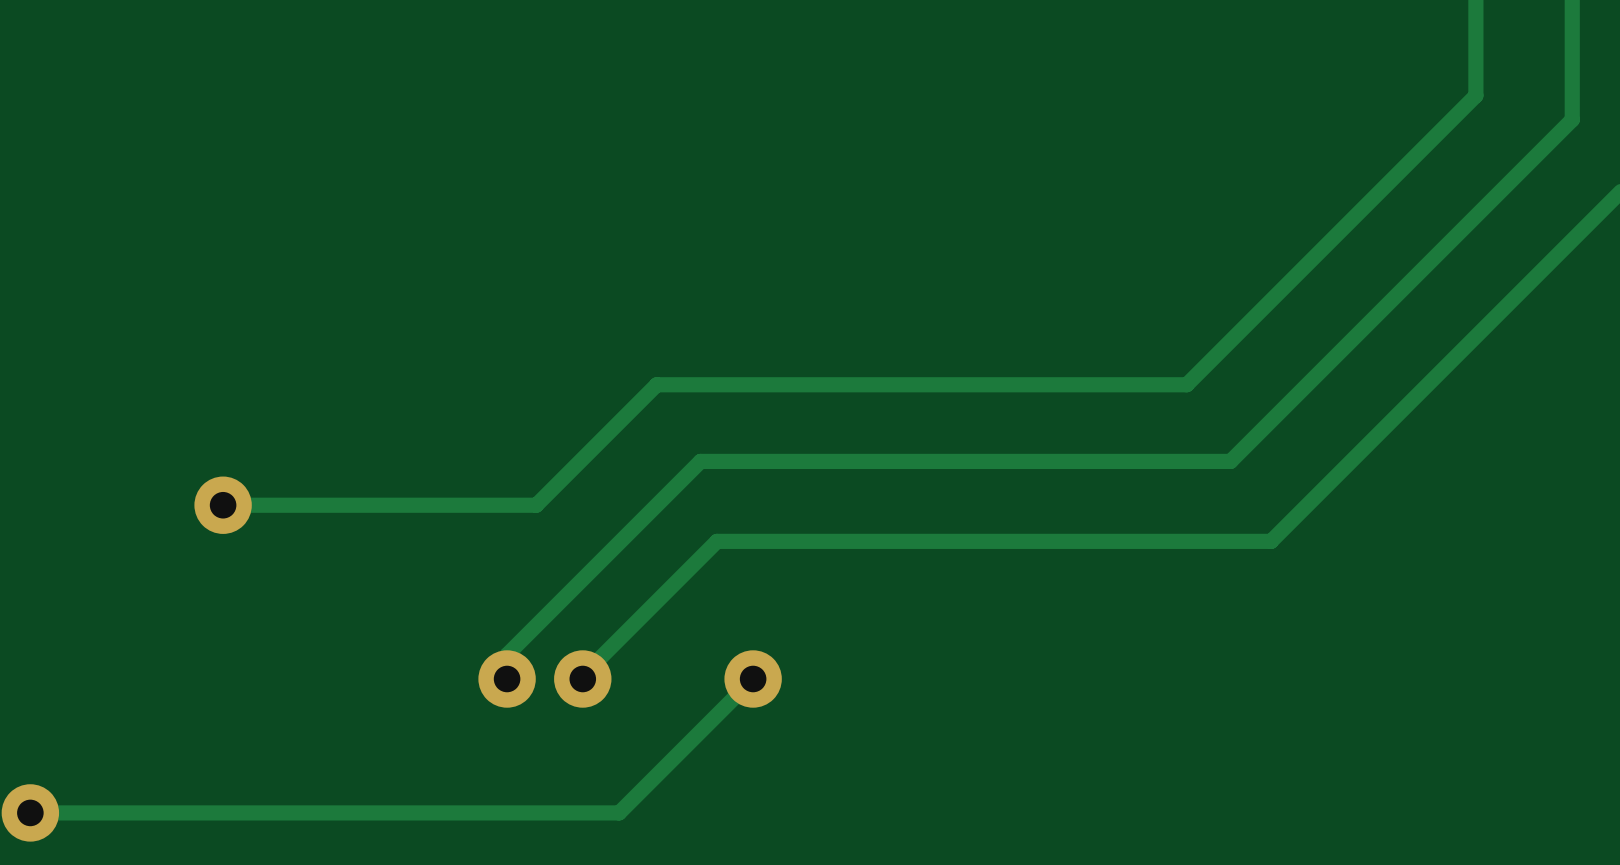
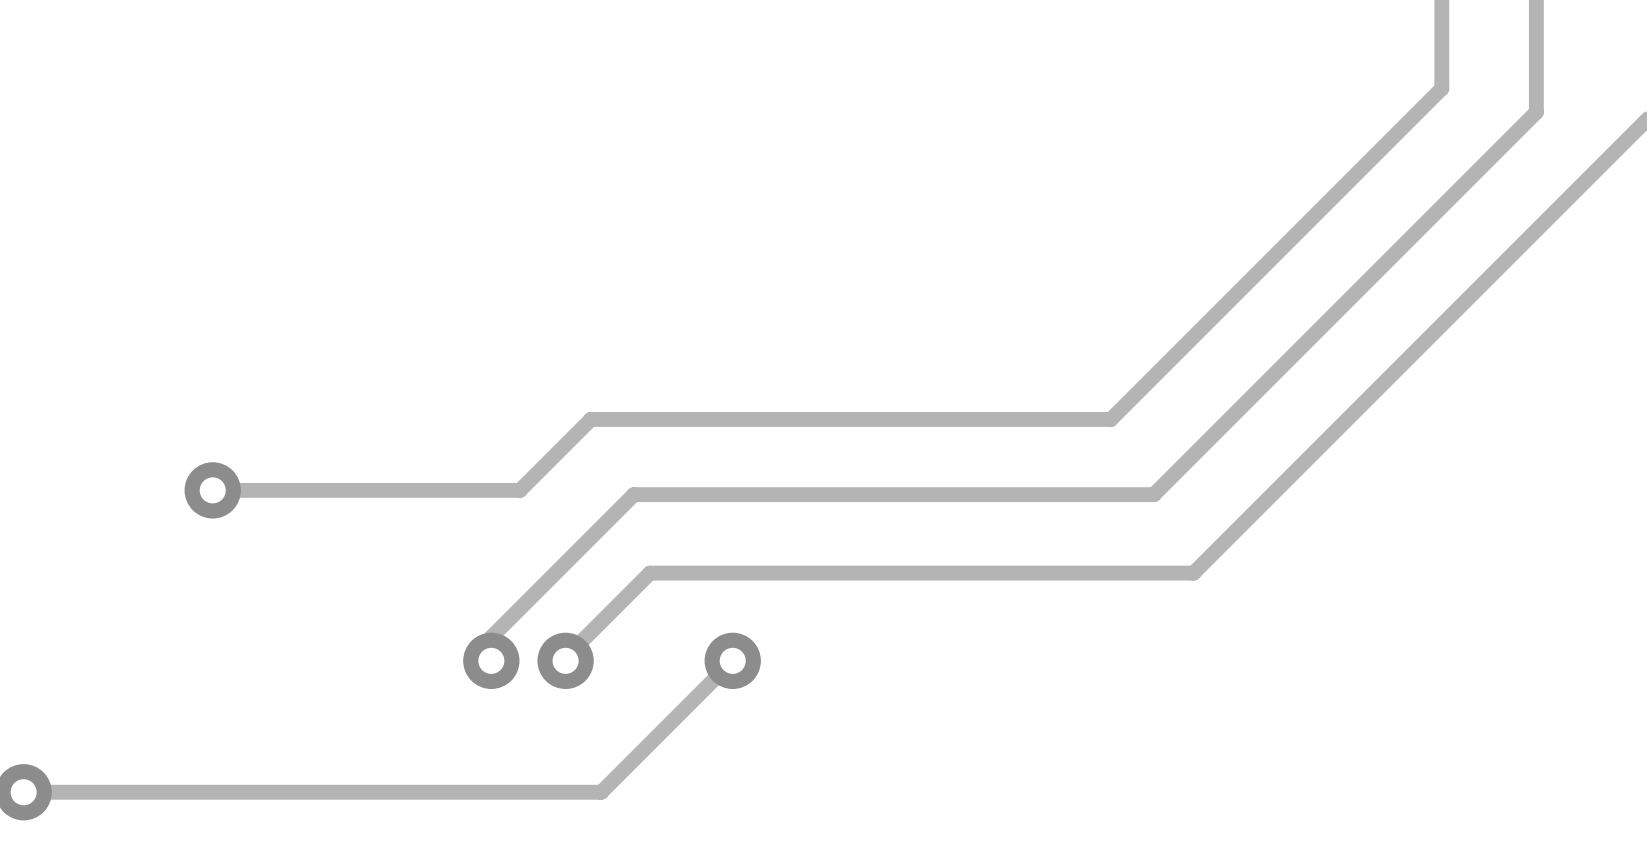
track: (1186, 384) (656, 384) (608, 432) -> (1158, 372) (1110, 419) (590, 419)
track: (1230, 461) (700, 461) (652, 509) -> (1201, 447) (1153, 494) (633, 494)
track: (1271, 541) (716, 541) (668, 589) -> (1240, 525) (1193, 573) (650, 573)

